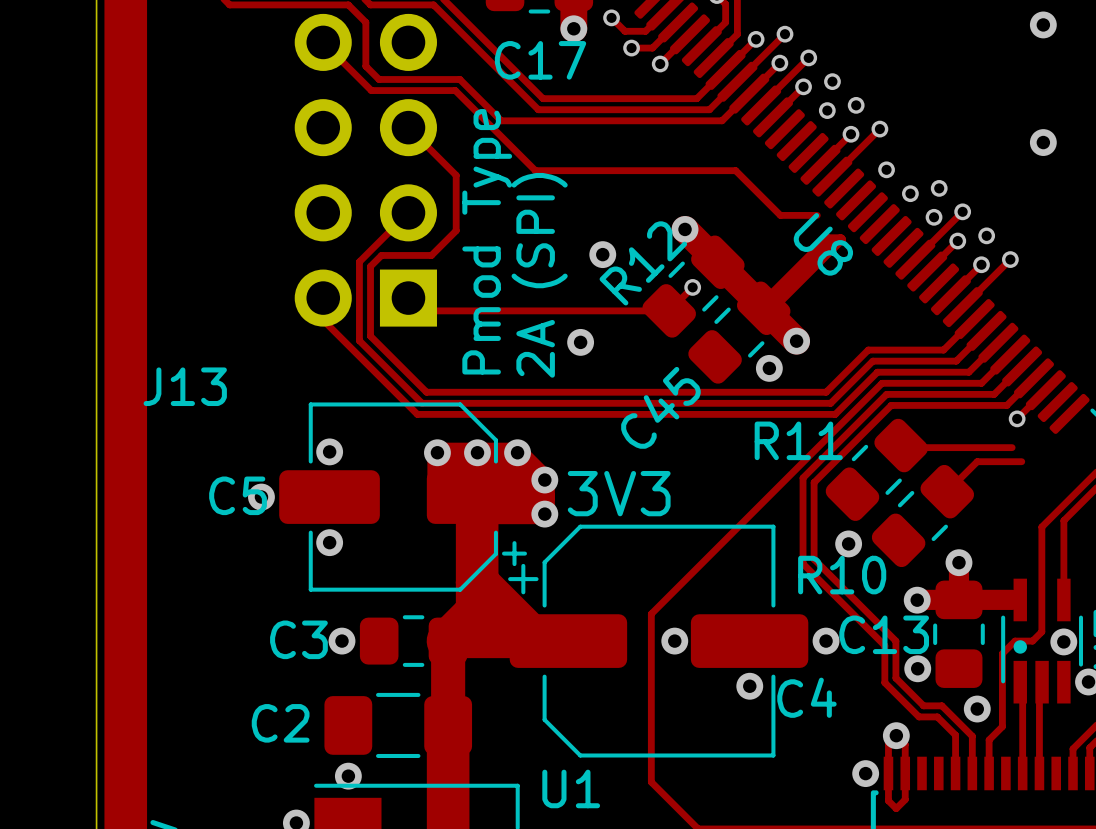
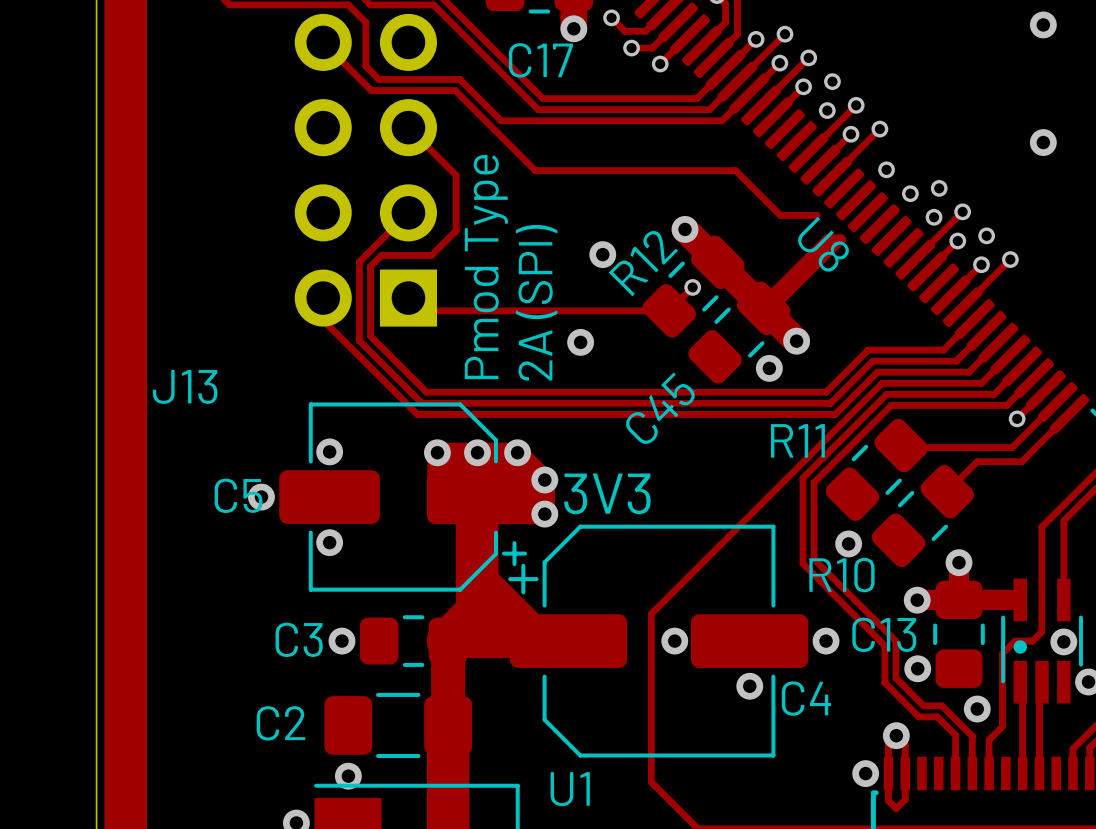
track: none -> (856, 105) (808, 152)
track: none -> (1057, 402) (1012, 447)
track: none -> (1069, 413) (1021, 461)

